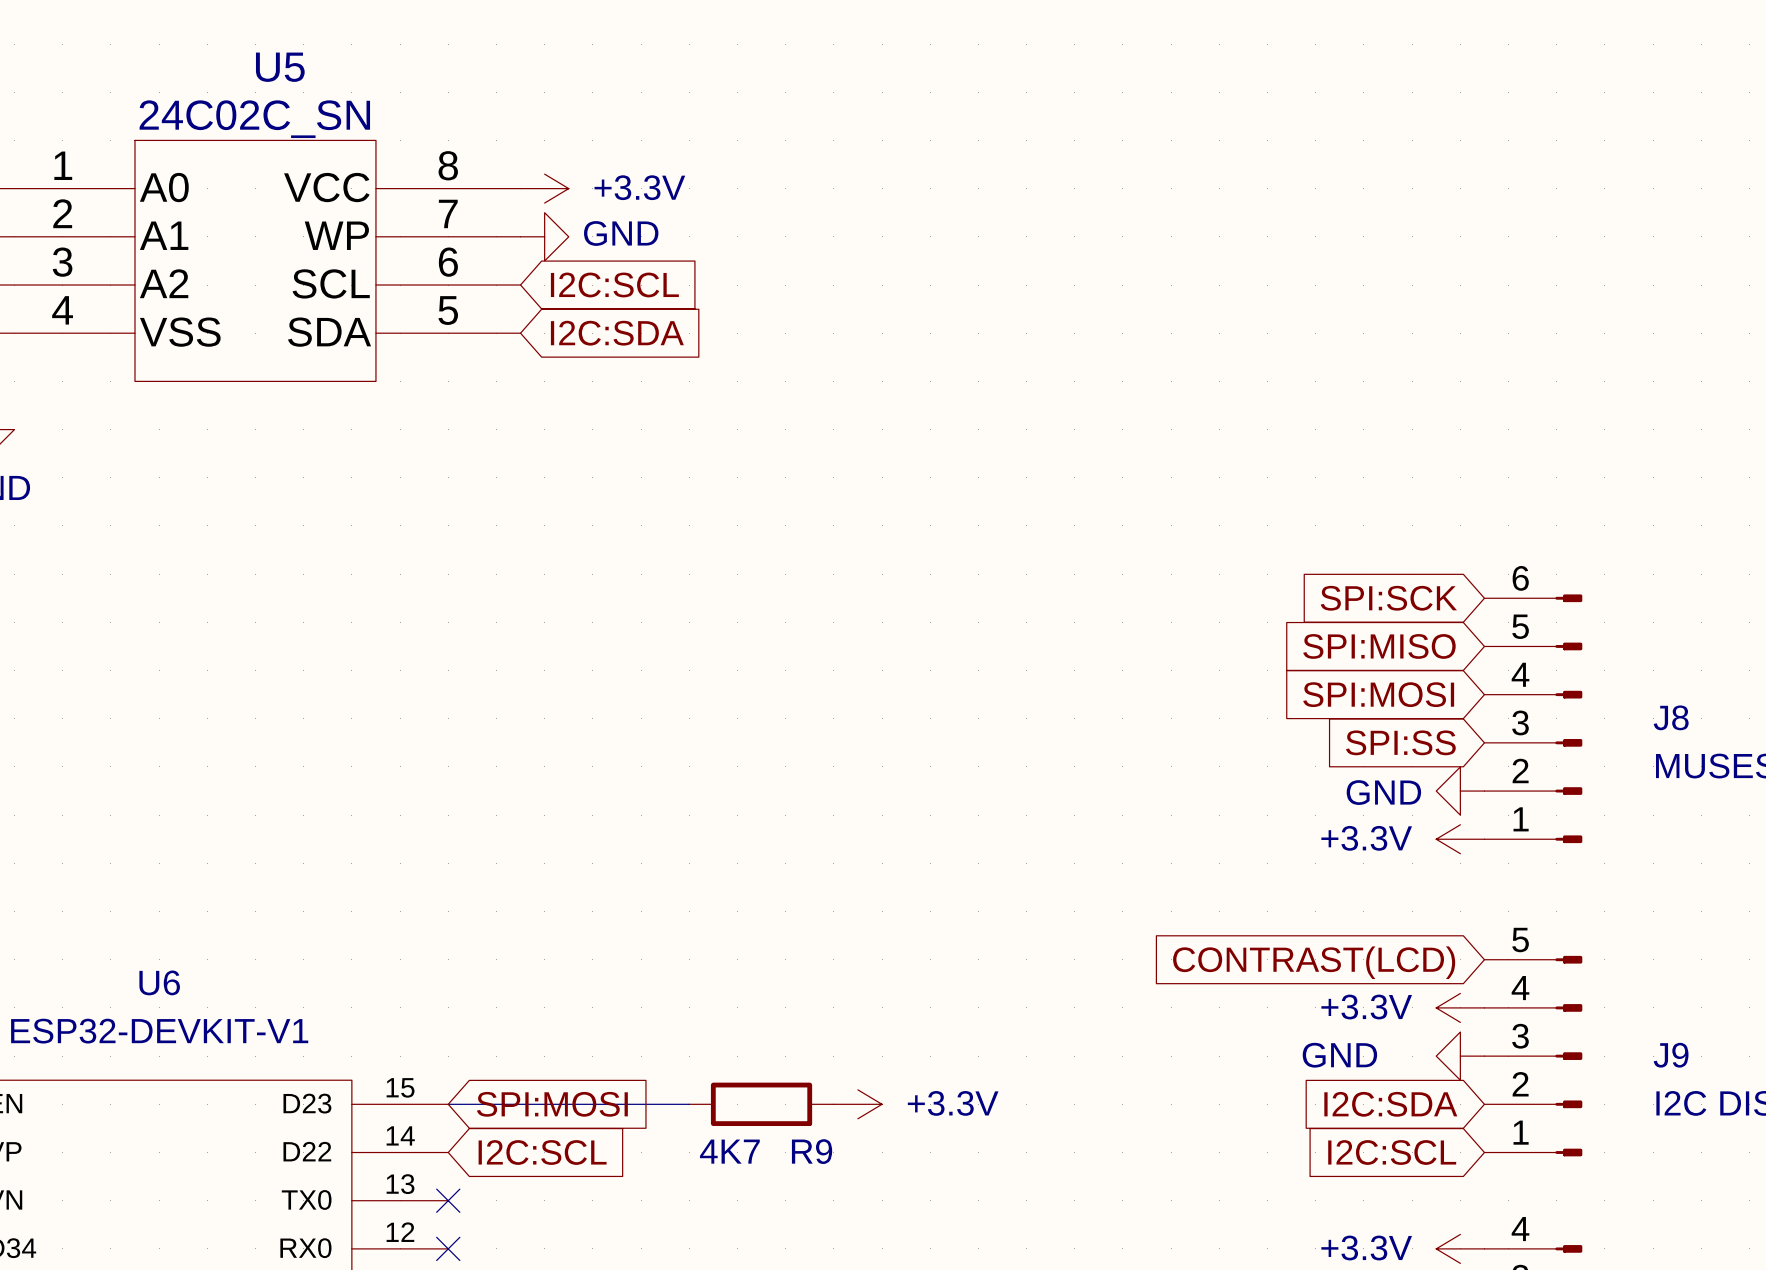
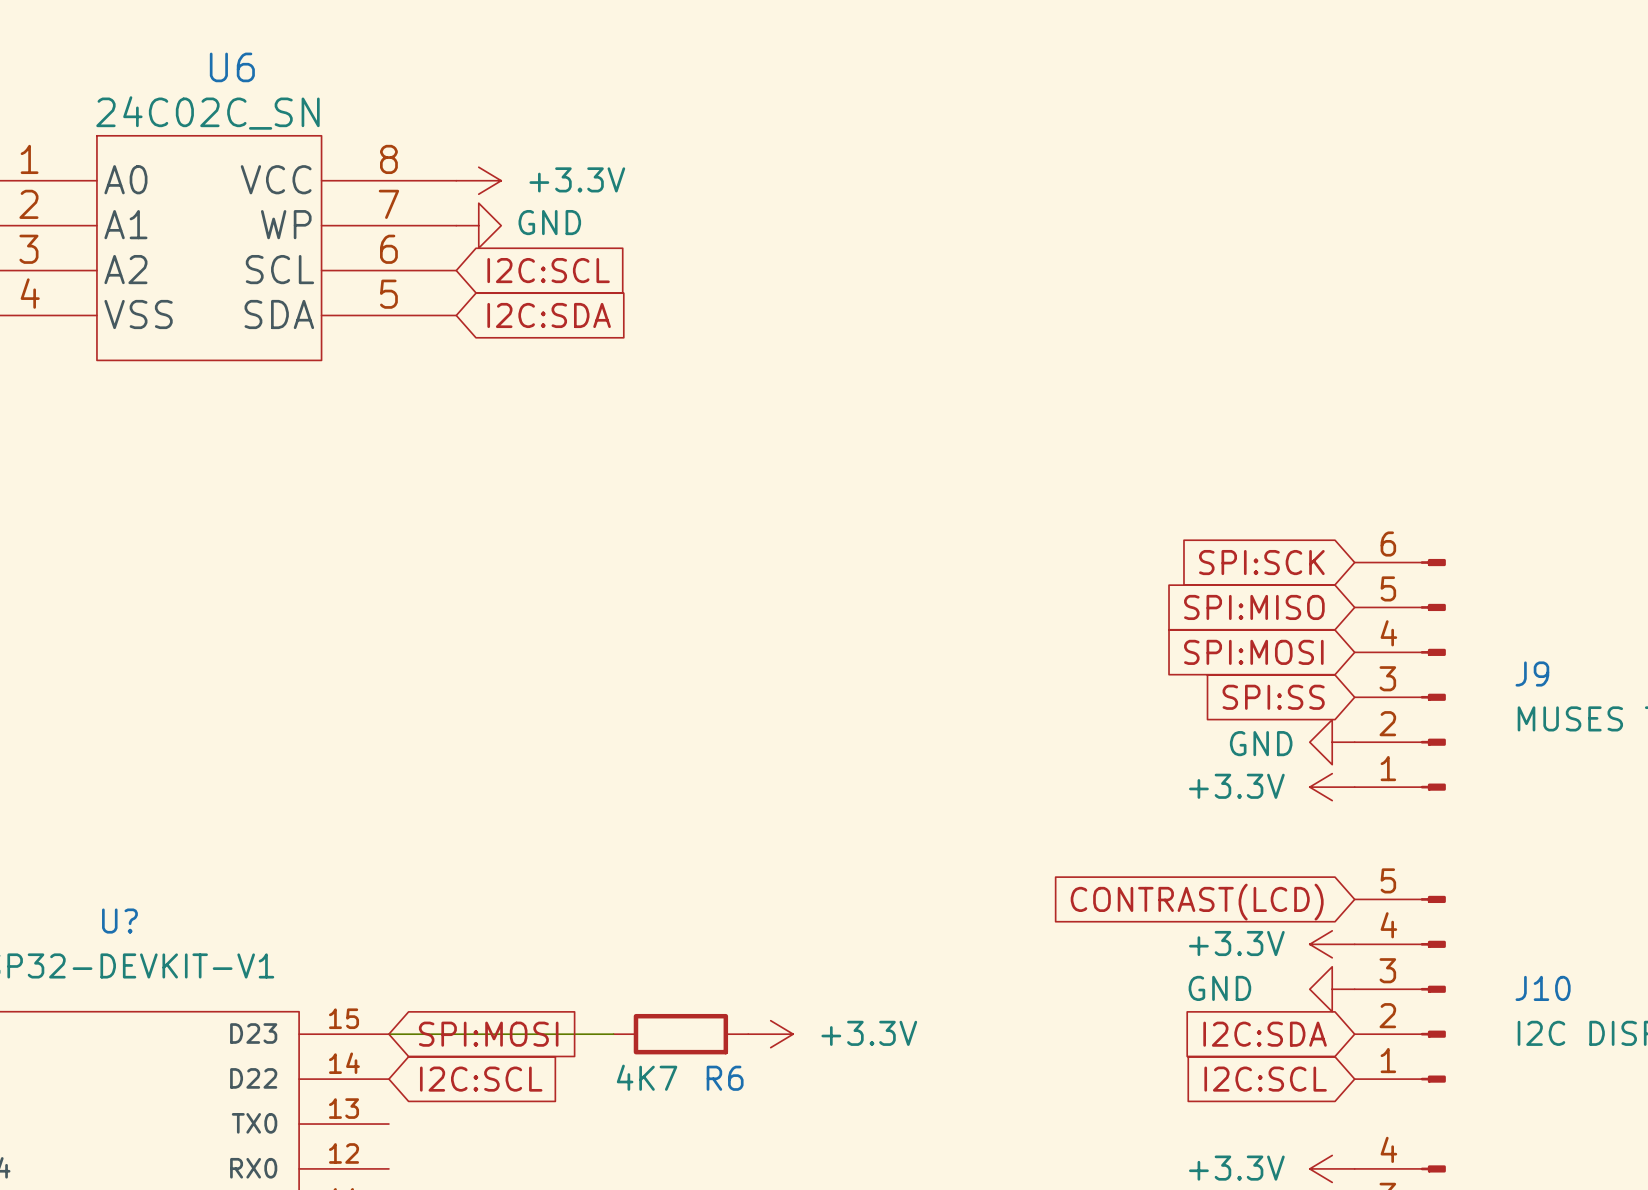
U5 name: U5 (280, 67) -> U6 (232, 67)
J8 name: J8 (1671, 717) -> J9 (1532, 673)
U6 name: U6 (159, 982) -> U? (119, 921)
J9 name: J9 (1671, 1055) -> J10 (1543, 988)
R9 name: R9 (812, 1151) -> R6 (725, 1078)
no-connect mark: (448, 1200) -> none
no-connect mark: (448, 1248) -> none

